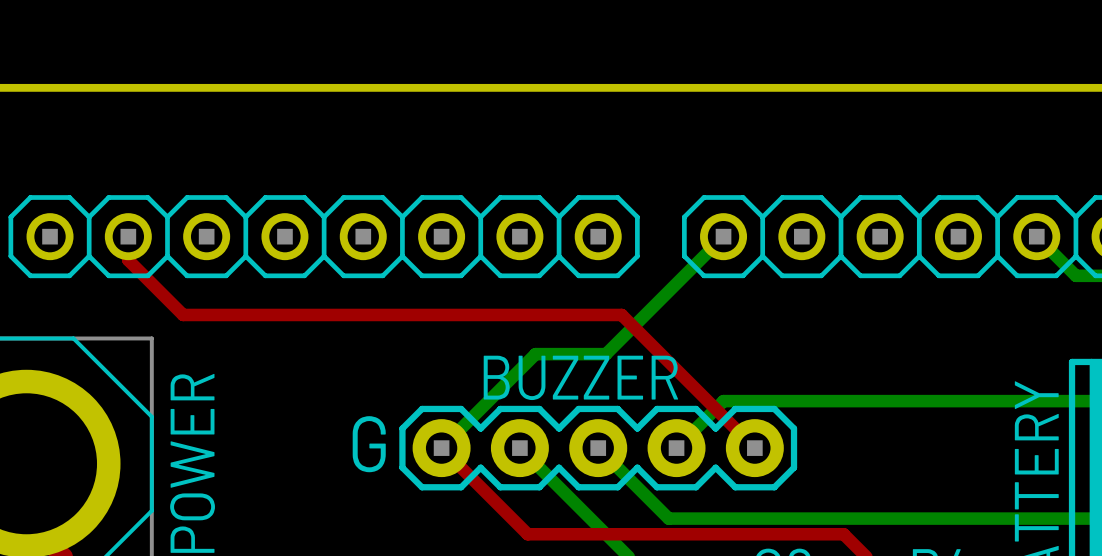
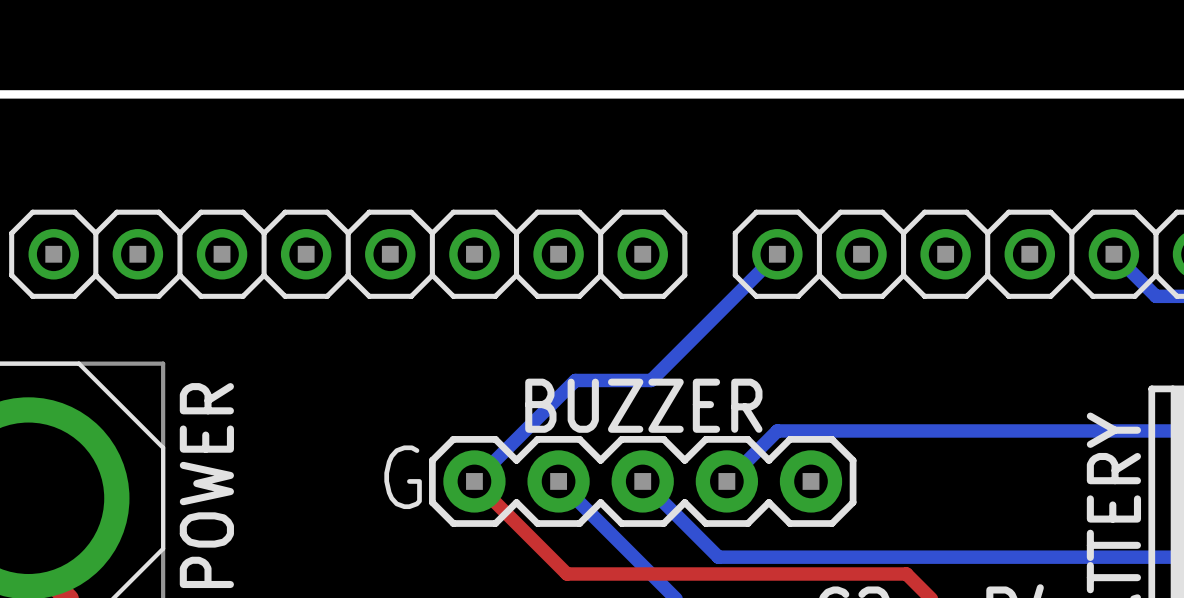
top track: (128, 236) (128, 260) (183, 314) (621, 314) (754, 448) -> none

